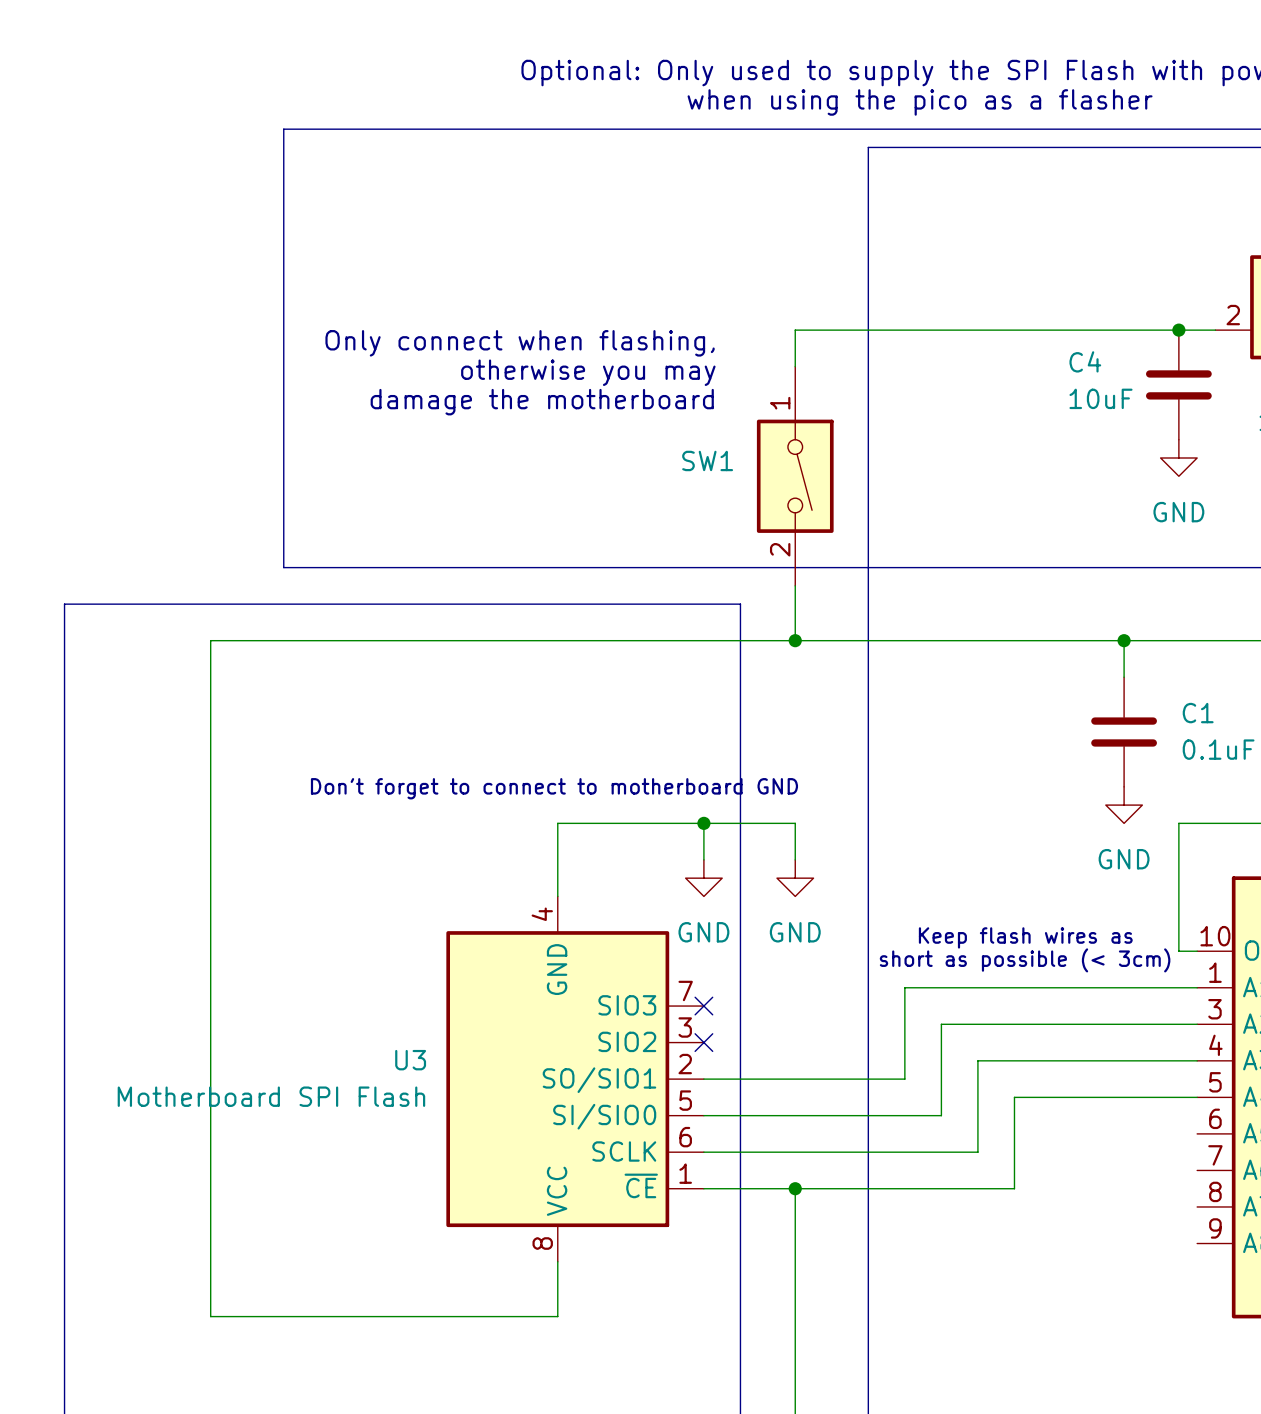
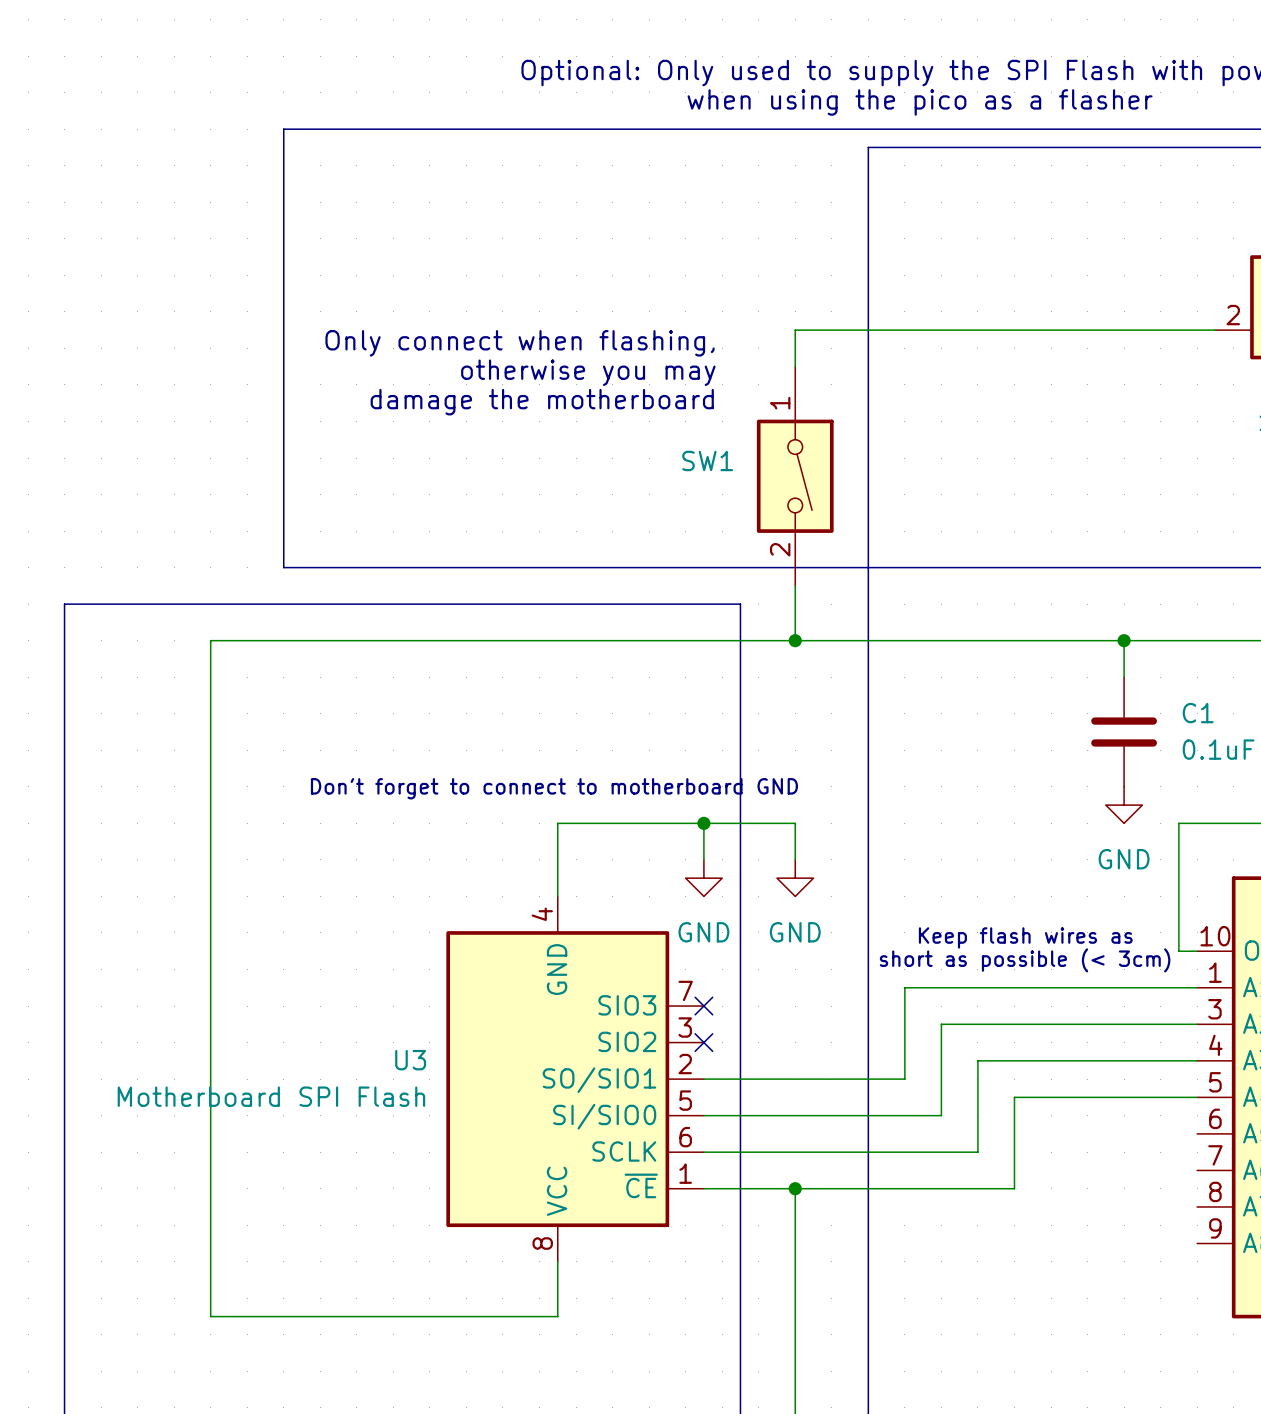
junction: (1178, 330) -> none
C4: 10uF (1178, 384) -> none
power symbol: GND (1178, 458) -> none

